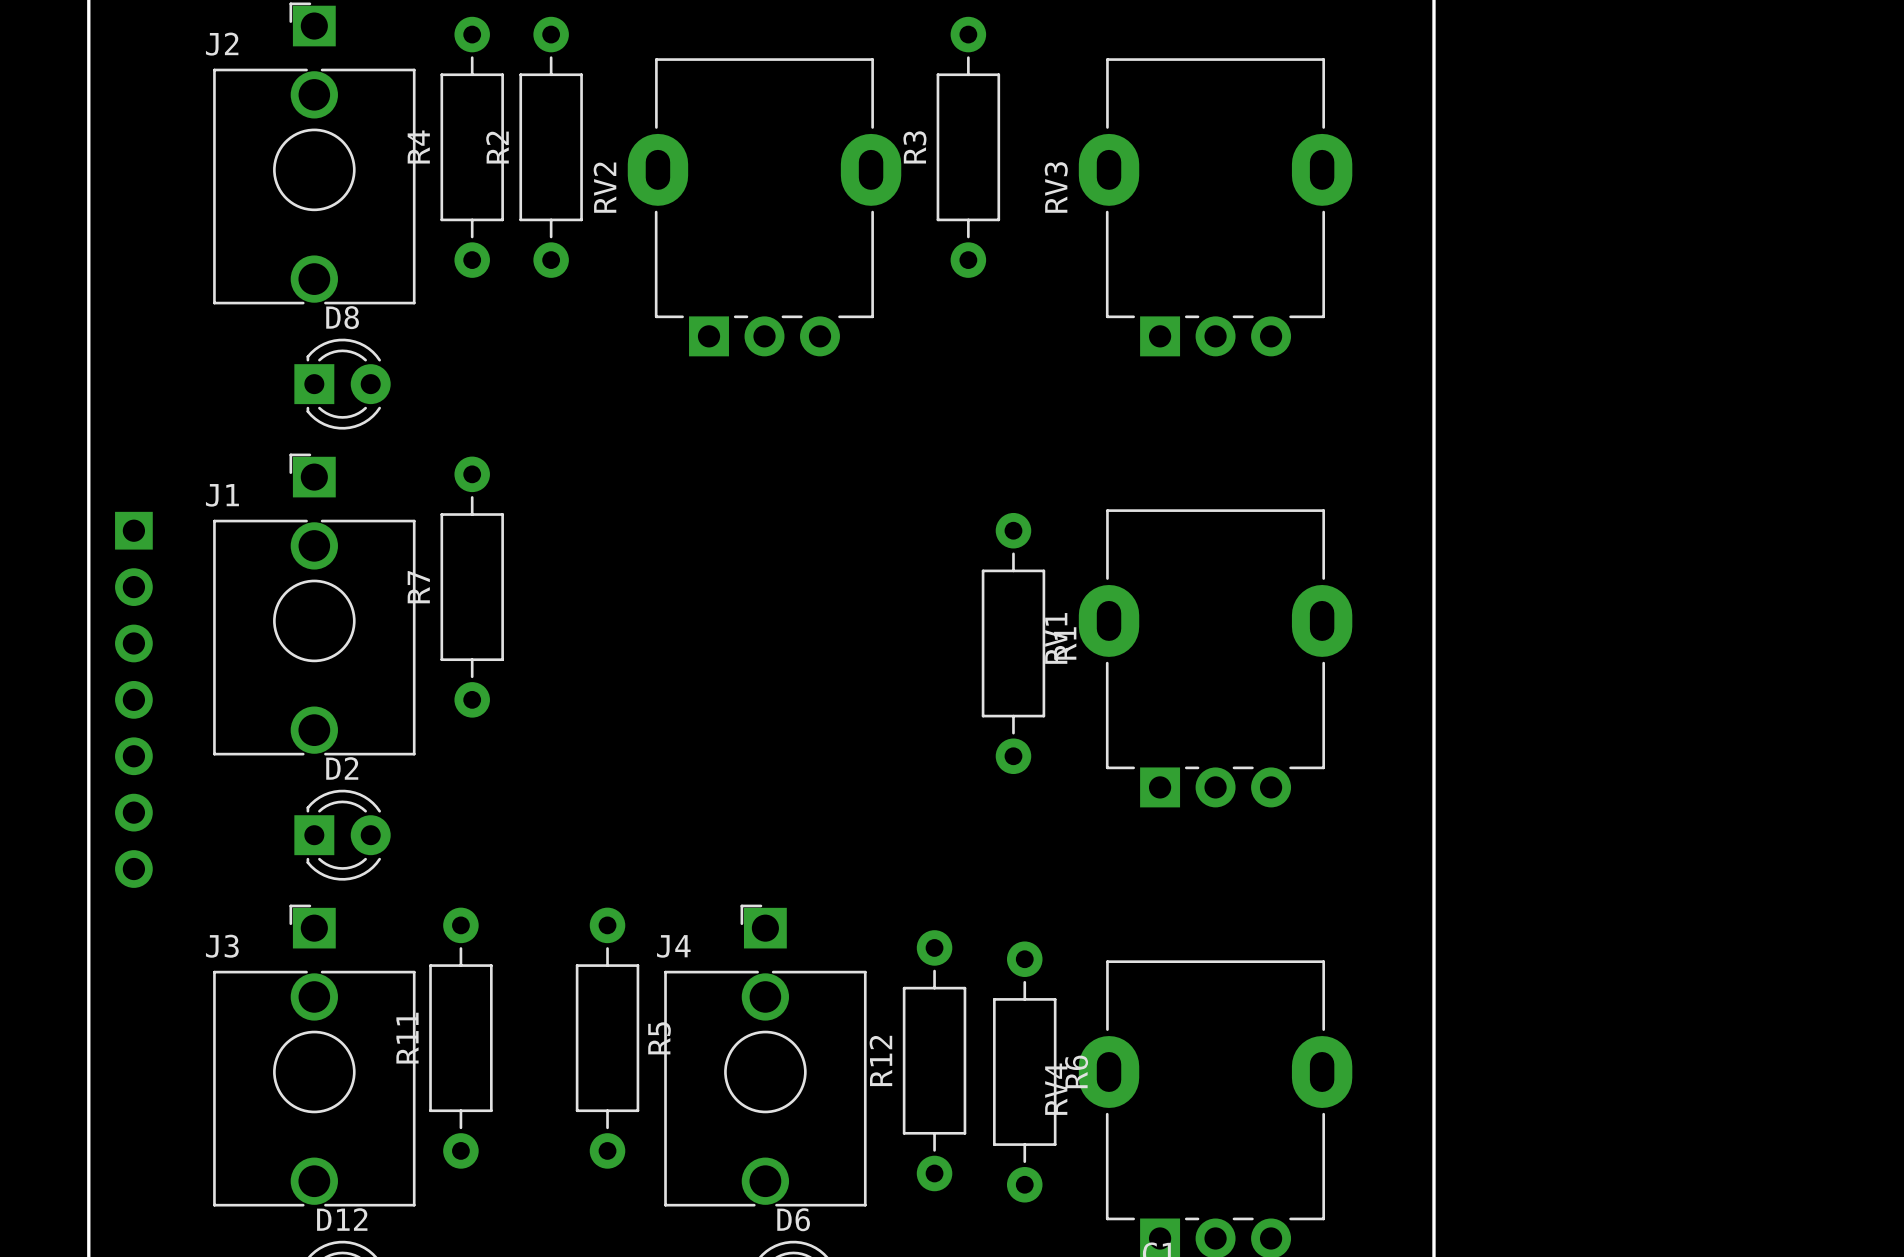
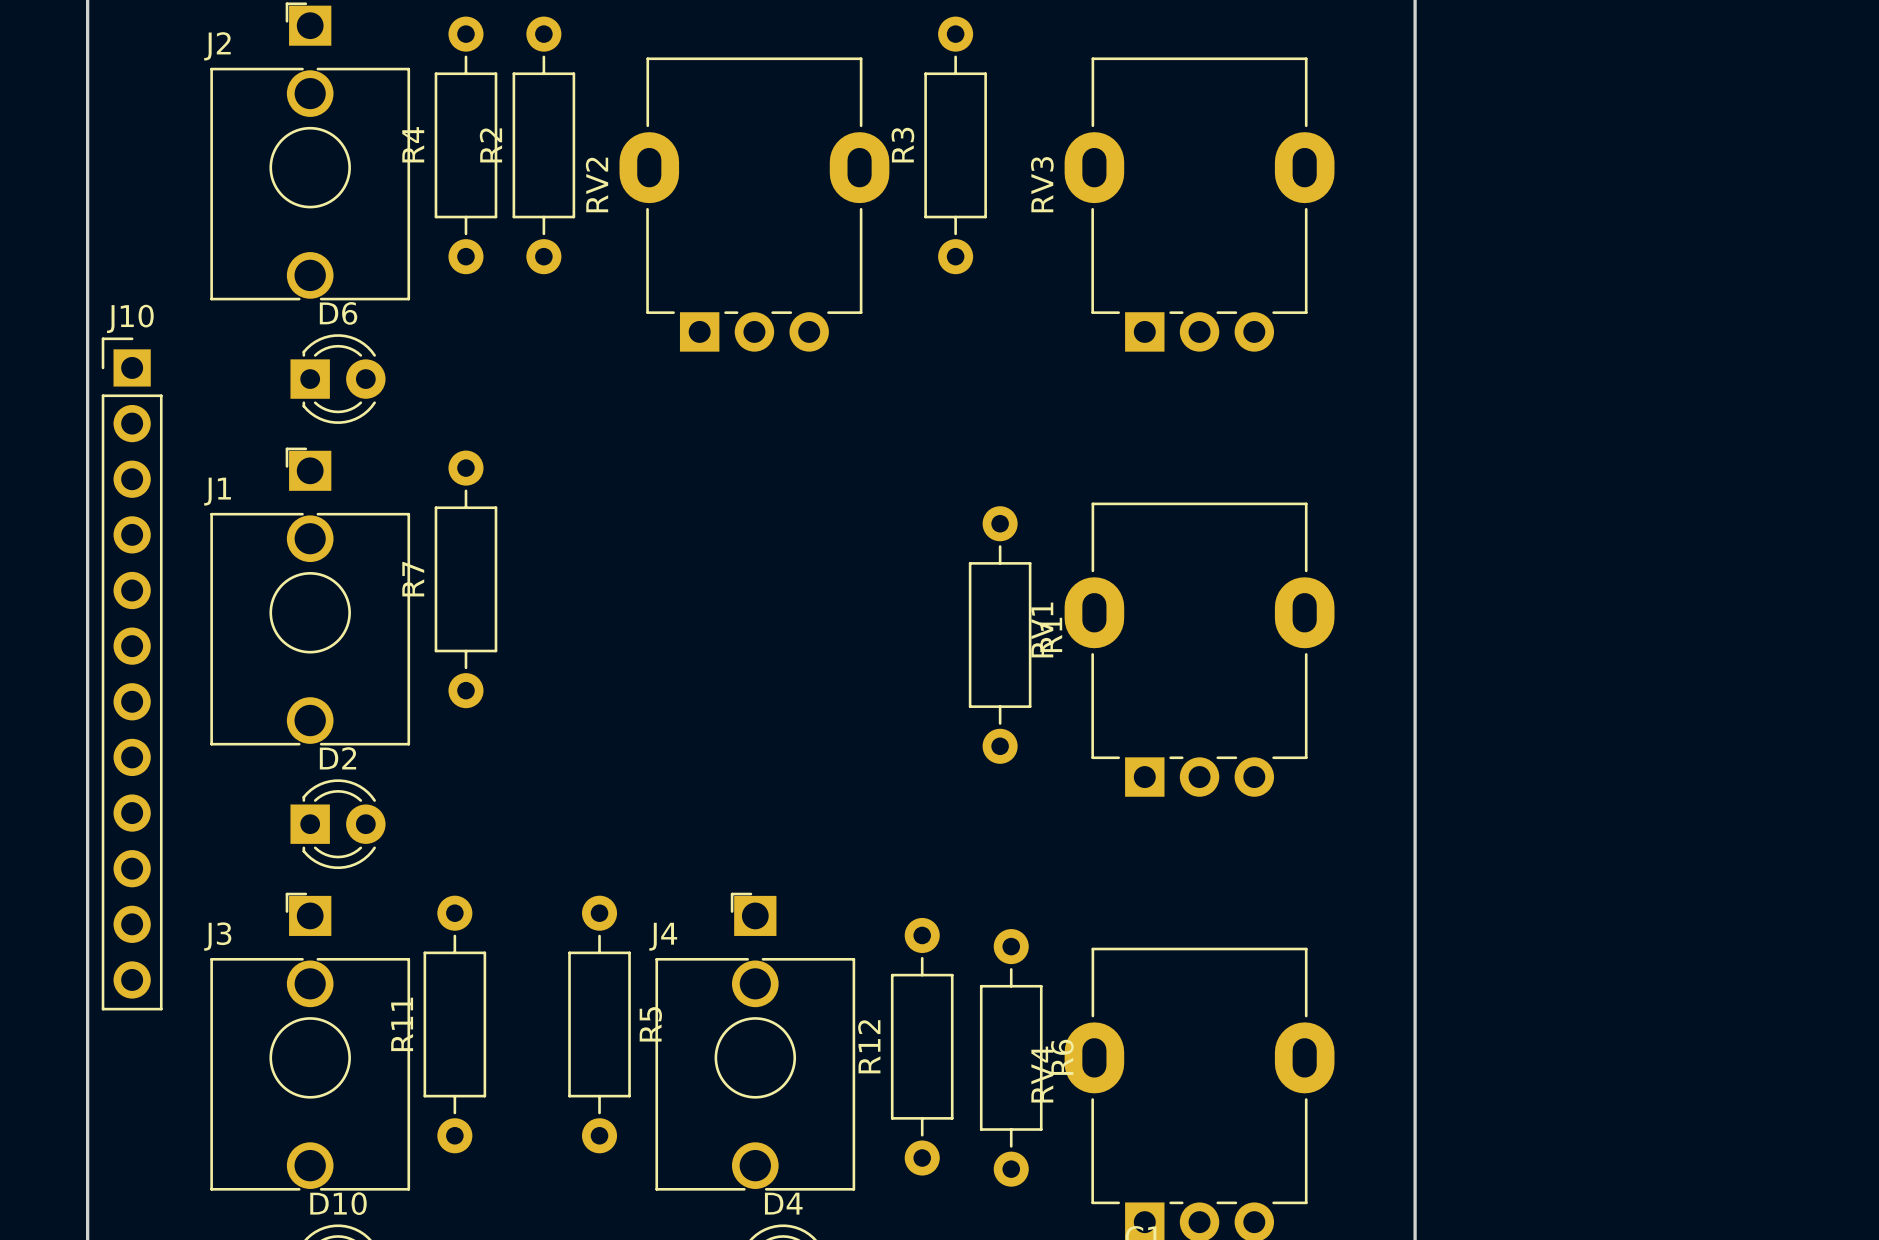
D8 name: D8 (342, 317) -> D6 (338, 313)
J10: none -> (132, 673)
part: (133, 699) -> none
D12 name: D12 (342, 1219) -> D10 (338, 1203)
D6 name: D6 (793, 1219) -> D4 (783, 1203)

